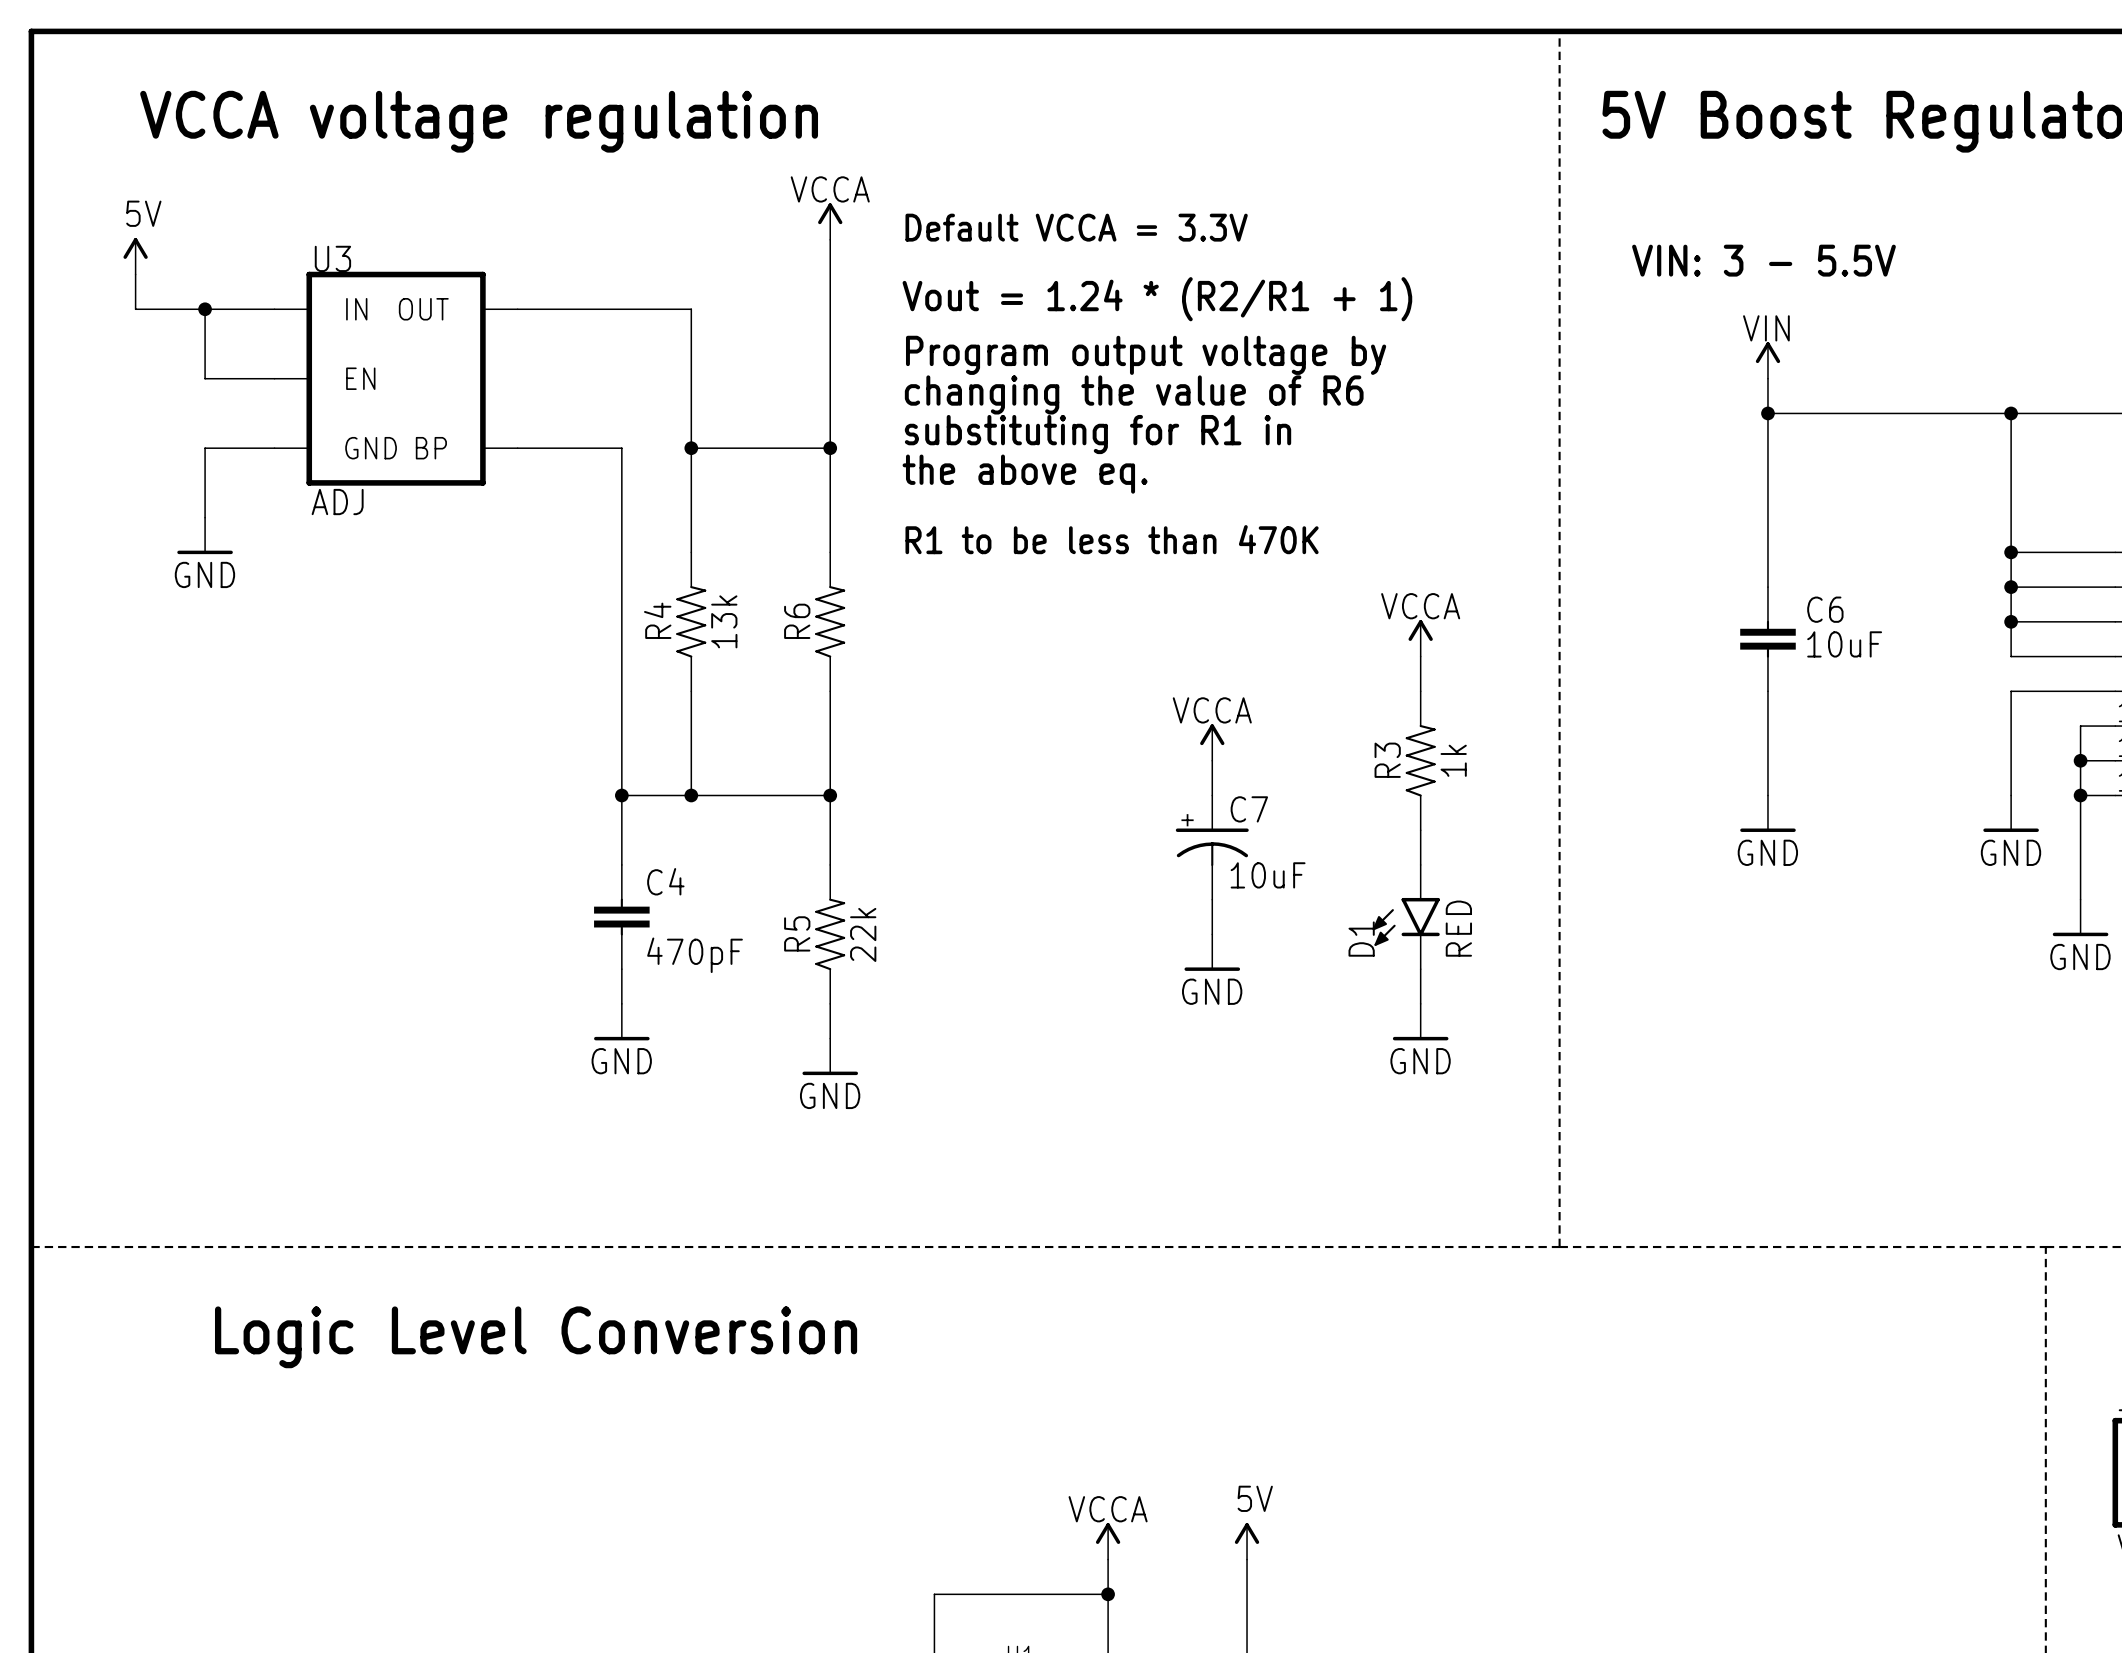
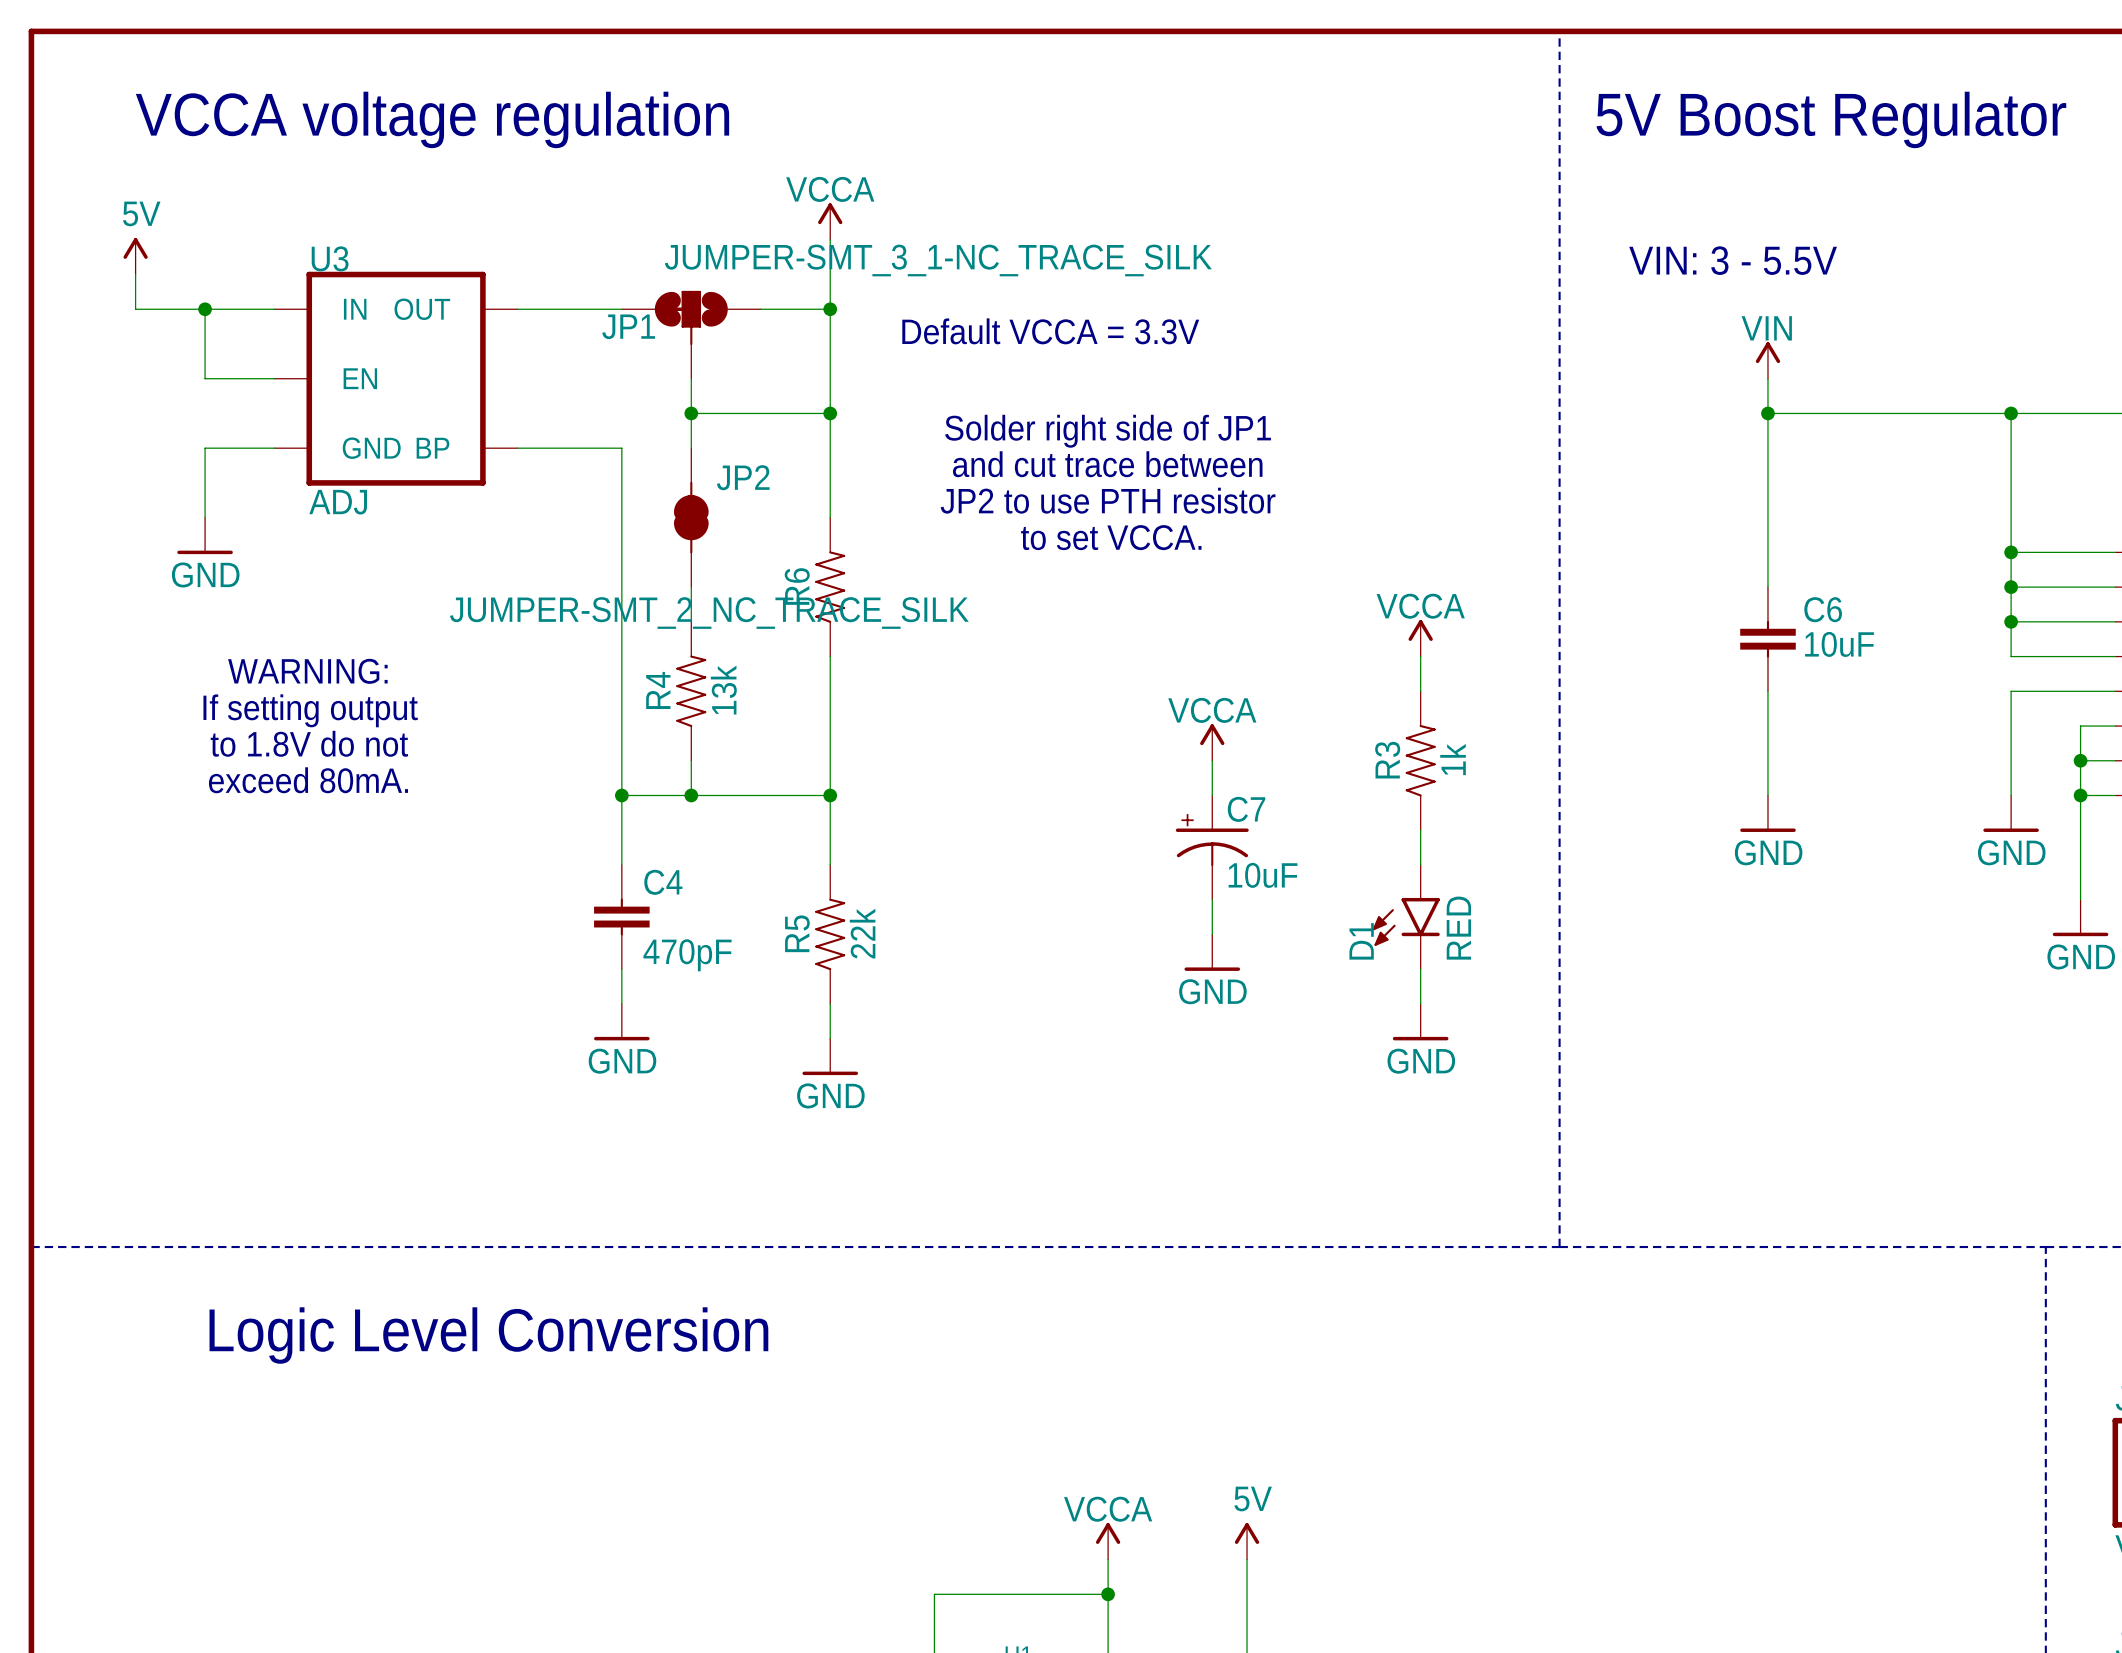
text position: Default VCCA = 3.3V (1076, 227) -> Default VCCA = 3.3V (1050, 331)
text: Vout = 1.24 * (R2/R1 + 1) (1157, 299) -> none
wire: none -> (760, 309) (830, 309)
junction: none -> (830, 309)
JP1: none -> JUMPER-SMT_3_1-NC_TRACE_SILK (691, 334)
text: Program output voltage by (1146, 355) -> none
text: changing the value of R6 (1134, 394) -> none
wire: none -> (691, 413) (830, 413)
text: none -> Solder right side of JP1 (1108, 431)
text: substituting for R1 in (1098, 434) -> none
junction position: (691, 448) -> (691, 413)
wire: (830, 448) (691, 448) (691, 552) -> none
junction position: (830, 448) -> (830, 413)
text: none -> and cut trace between (1107, 464)
text: the above eq. (1025, 474) -> none
text: none -> JP2 to use PTH resistor (1108, 500)
JP2: none -> JUMPER-SMT_2_NC_TRACE_SILK (691, 517)
text: none -> to set VCCA. (1111, 537)
text: R1 to be less than 470K (1112, 539) -> none
wire: none -> (691, 587) (691, 621)
R4 position: (691, 621) -> (691, 691)
R6 position: (830, 621) -> (830, 587)
text: none -> WARNING: (307, 671)
text: none -> If setting output (310, 710)
text: none -> to 1.8V do not (309, 743)
text: none -> exceed 80mA. (308, 780)

